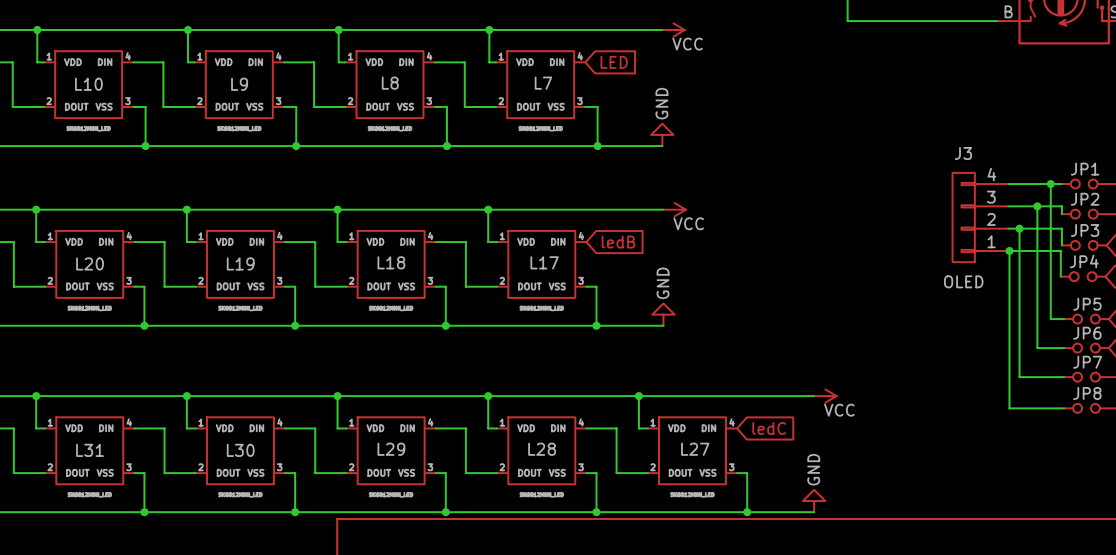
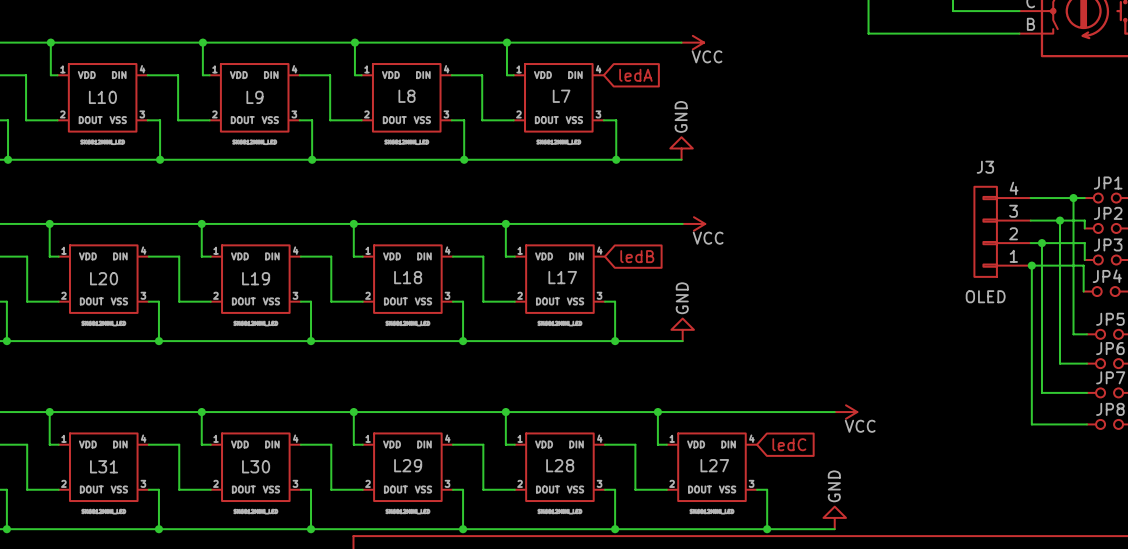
global label: LED (614, 62) -> ledA (635, 75)

